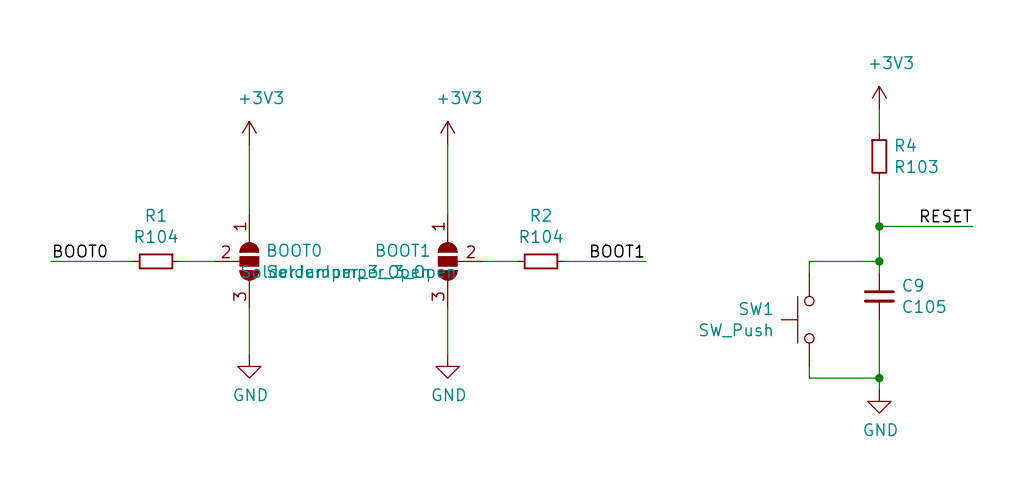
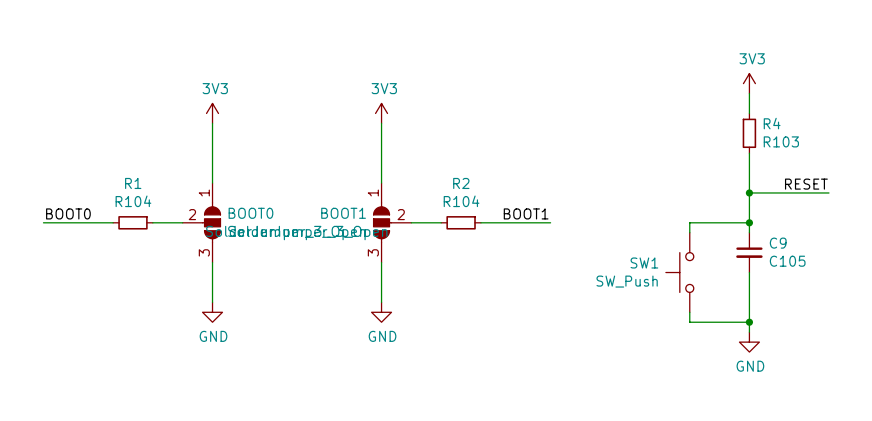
power symbol: +3V3 (879, 98) -> 3V3 (749, 83)
power symbol: +3V3 (249, 133) -> 3V3 (212, 113)
power symbol: +3V3 (447, 133) -> 3V3 (381, 113)

